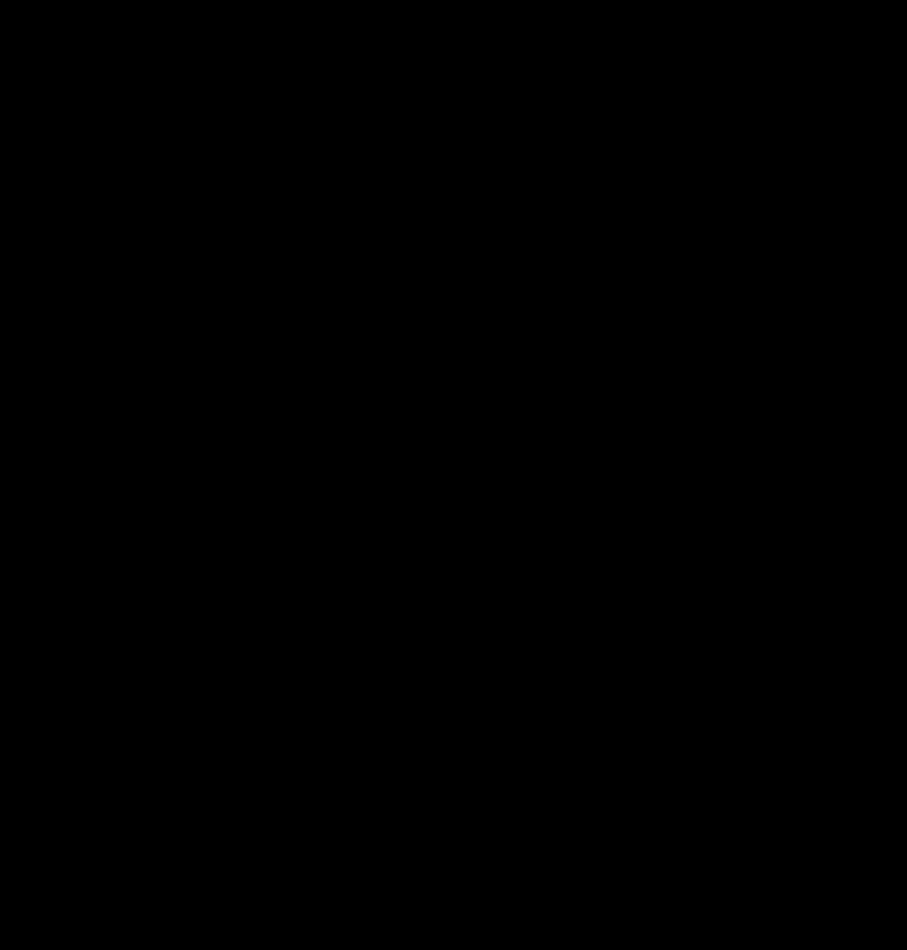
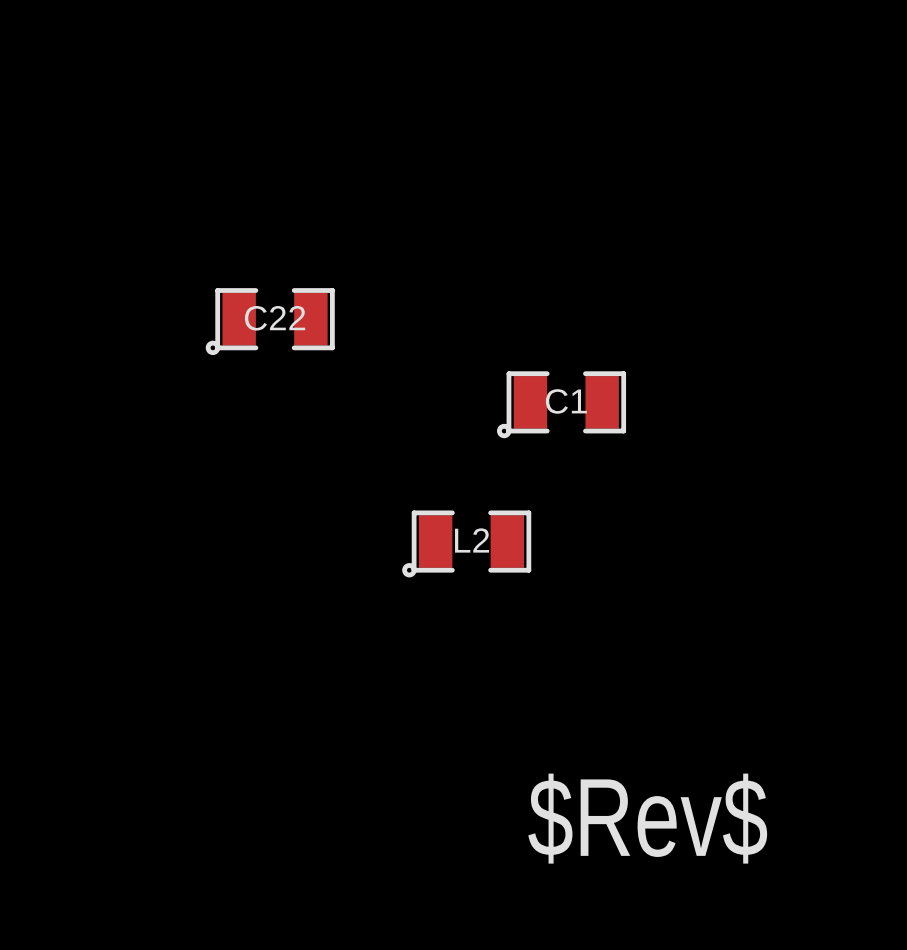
C22: none -> (270, 321)
C1: none -> (561, 404)
L2: none -> (466, 543)
text: none -> $Rev$ (647, 818)

